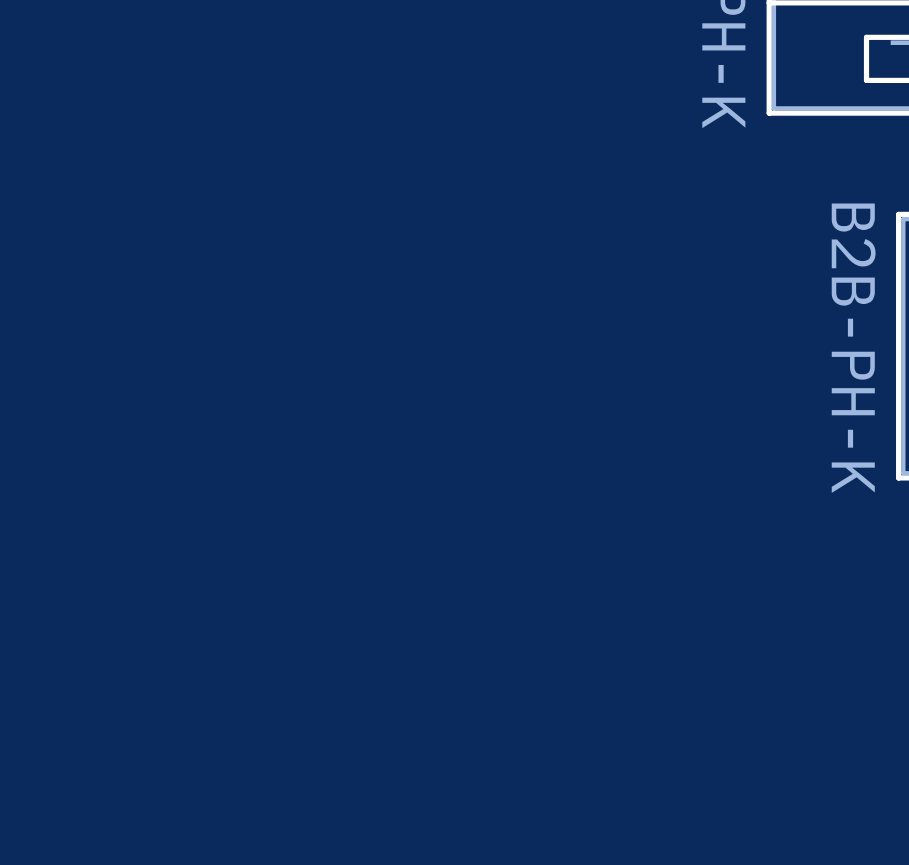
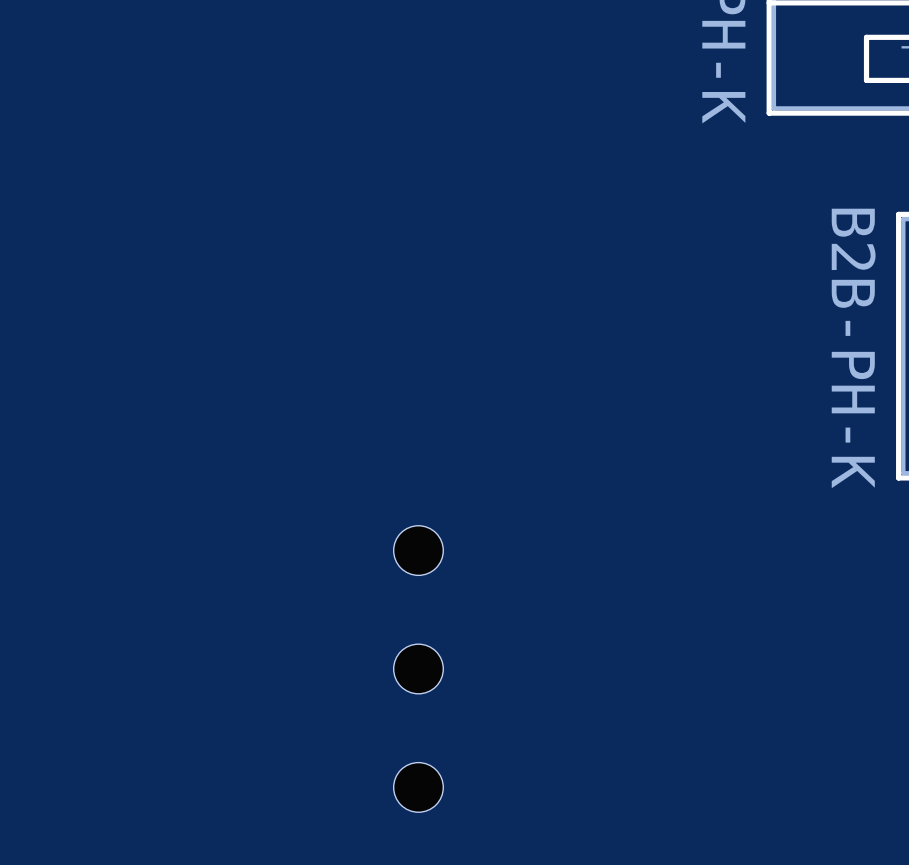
part: none -> (418, 550)
part: none -> (418, 668)
part: none -> (418, 787)

